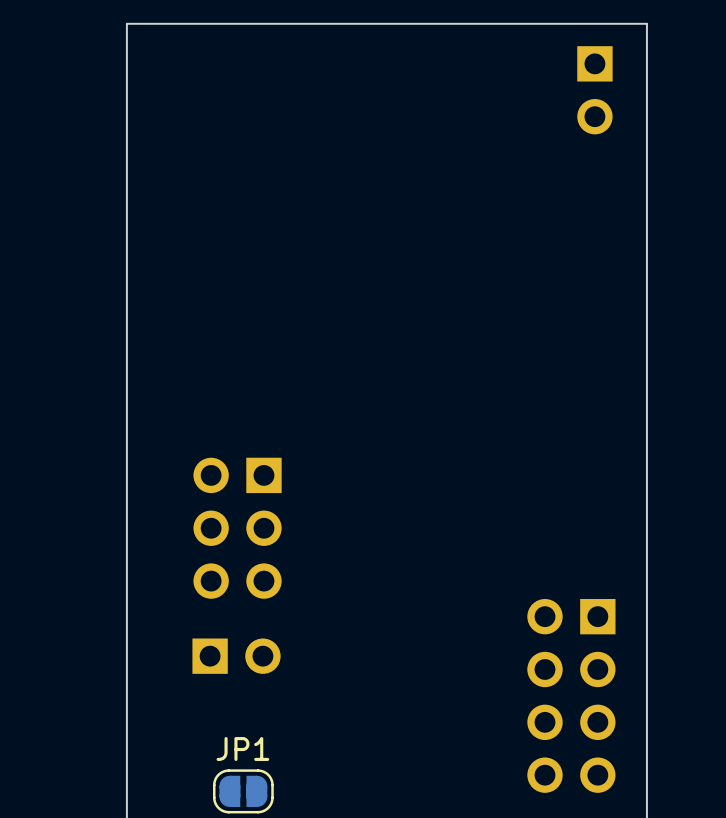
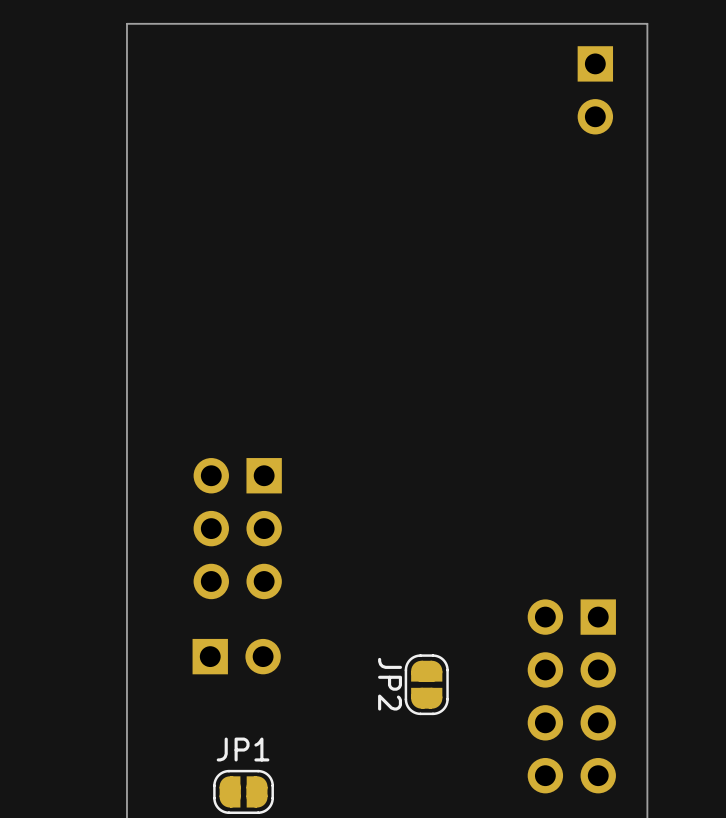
JP2: none -> (426, 684)

